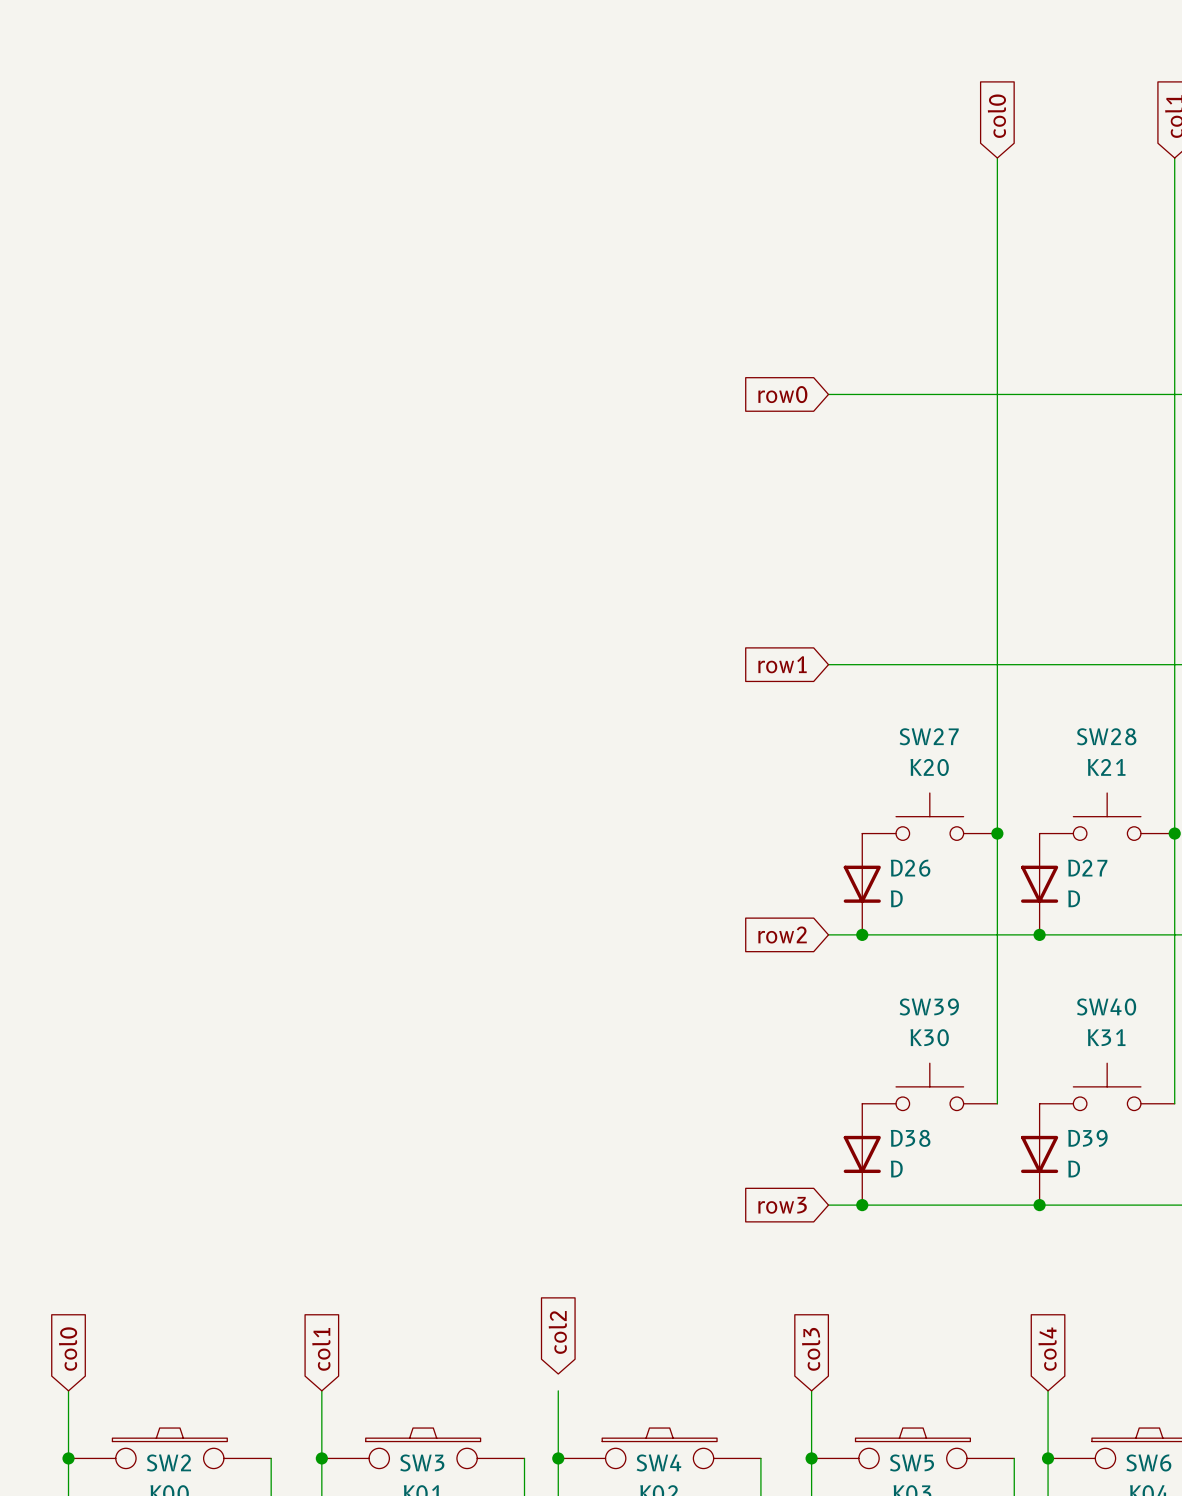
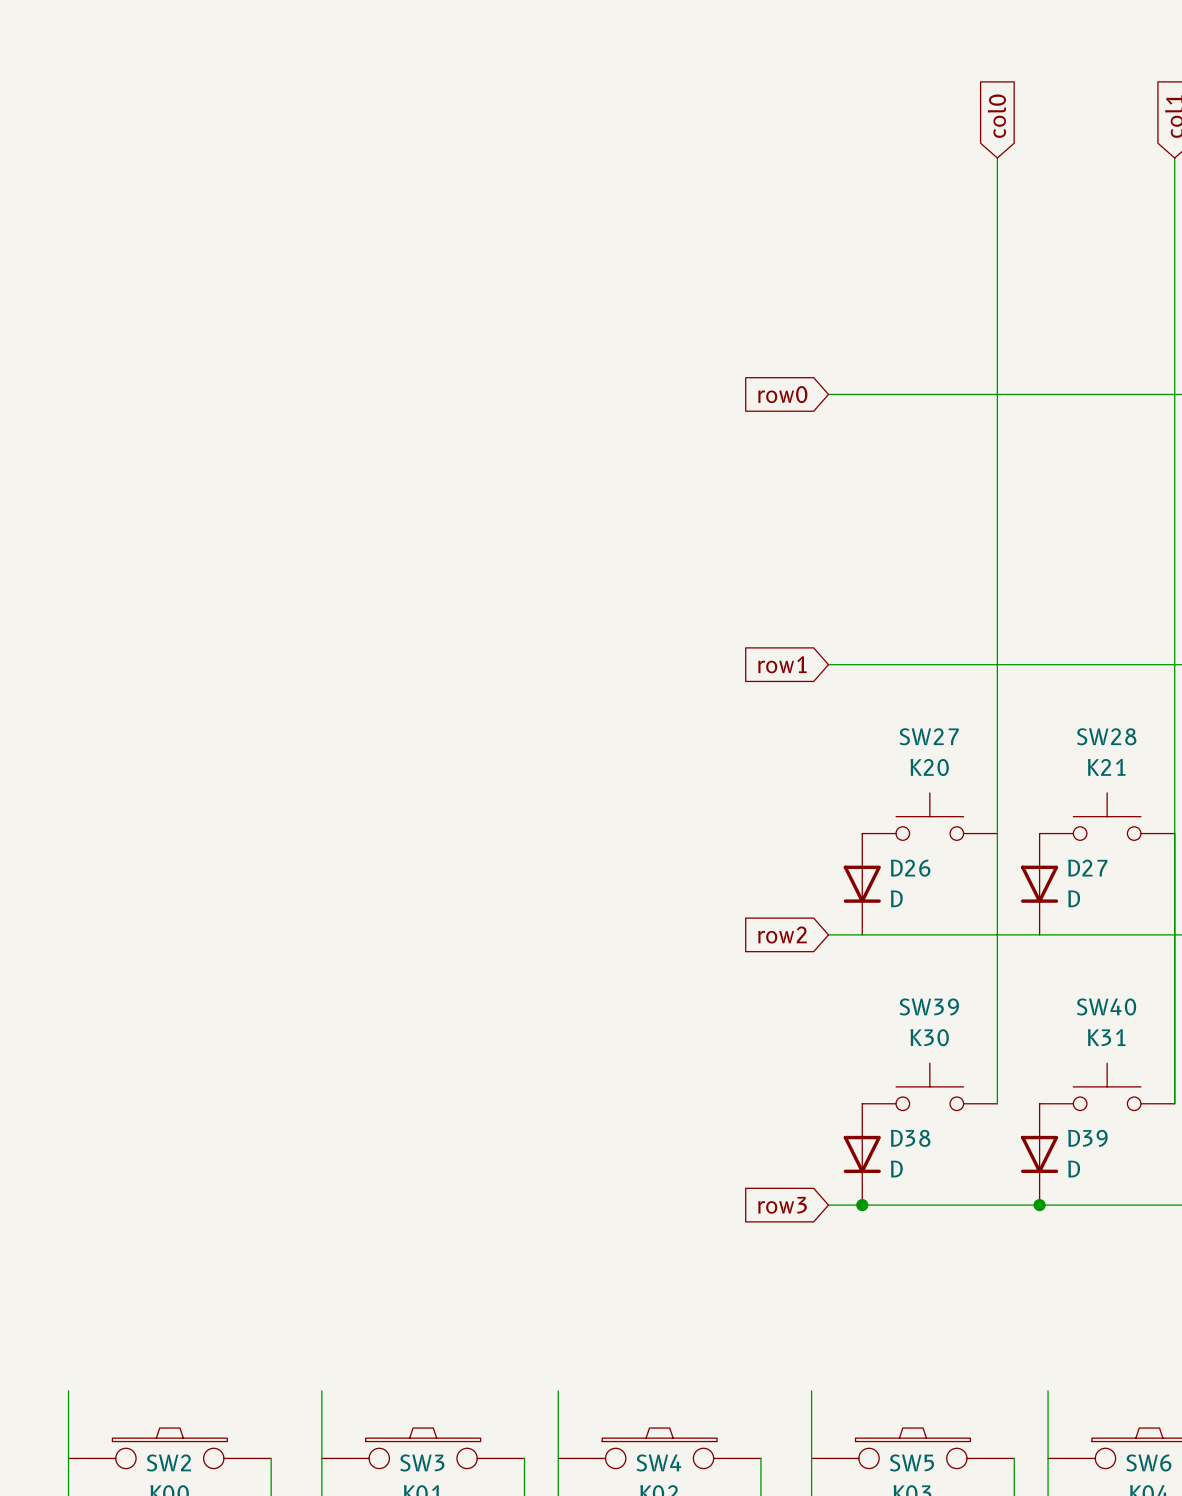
junction: (997, 833) -> none
junction: (1174, 833) -> none
junction: (862, 934) -> none
junction: (1039, 934) -> none
global label: col2 (557, 1332) -> none
global label: col0 (68, 1349) -> none
global label: col1 (321, 1349) -> none
global label: col3 (811, 1349) -> none
global label: col4 (1047, 1349) -> none
junction: (68, 1458) -> none
junction: (321, 1458) -> none
junction: (558, 1458) -> none
junction: (811, 1458) -> none
junction: (1048, 1458) -> none

